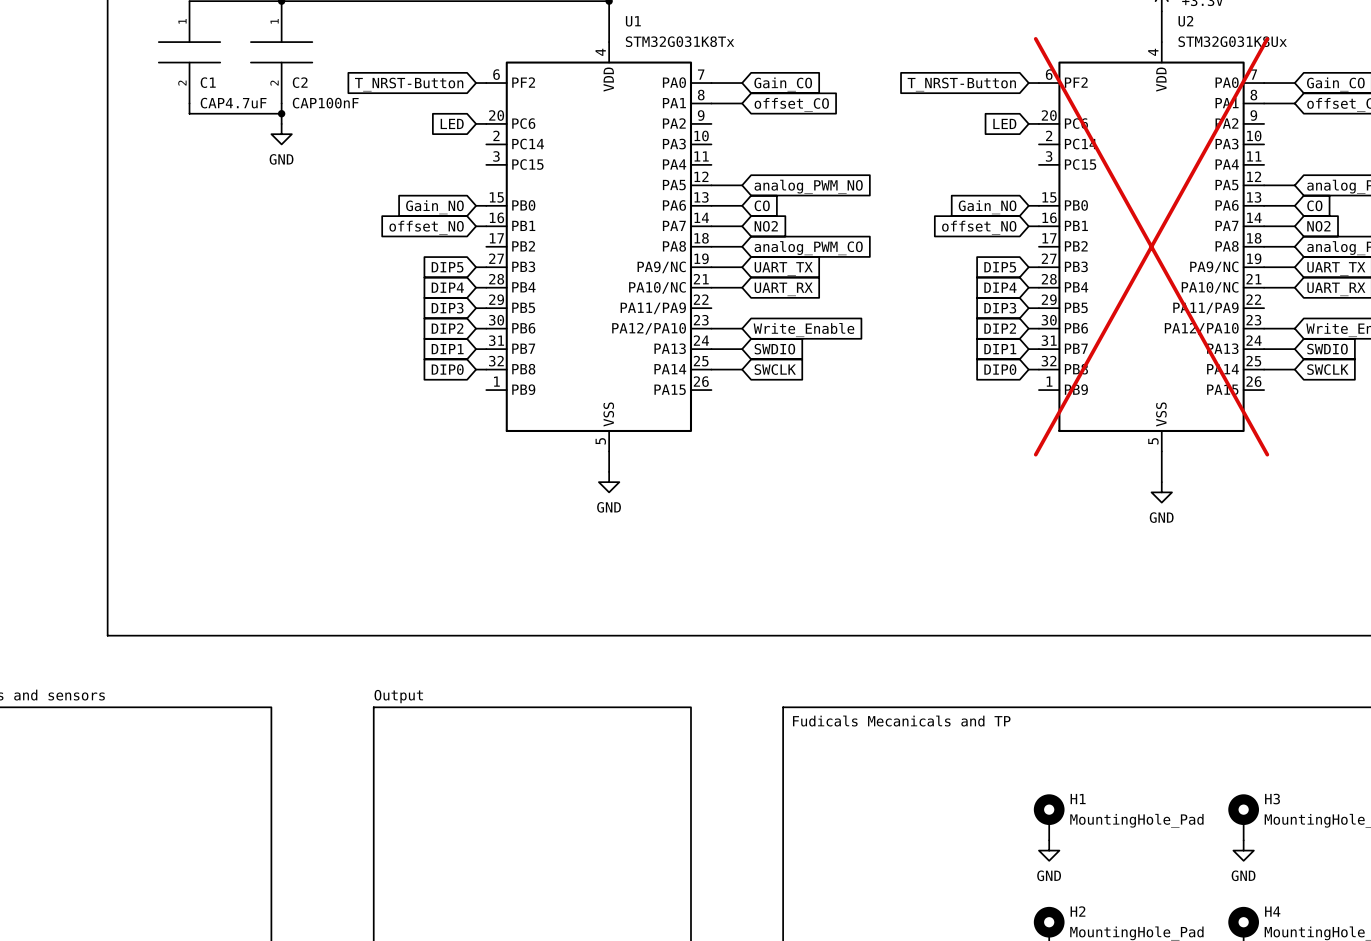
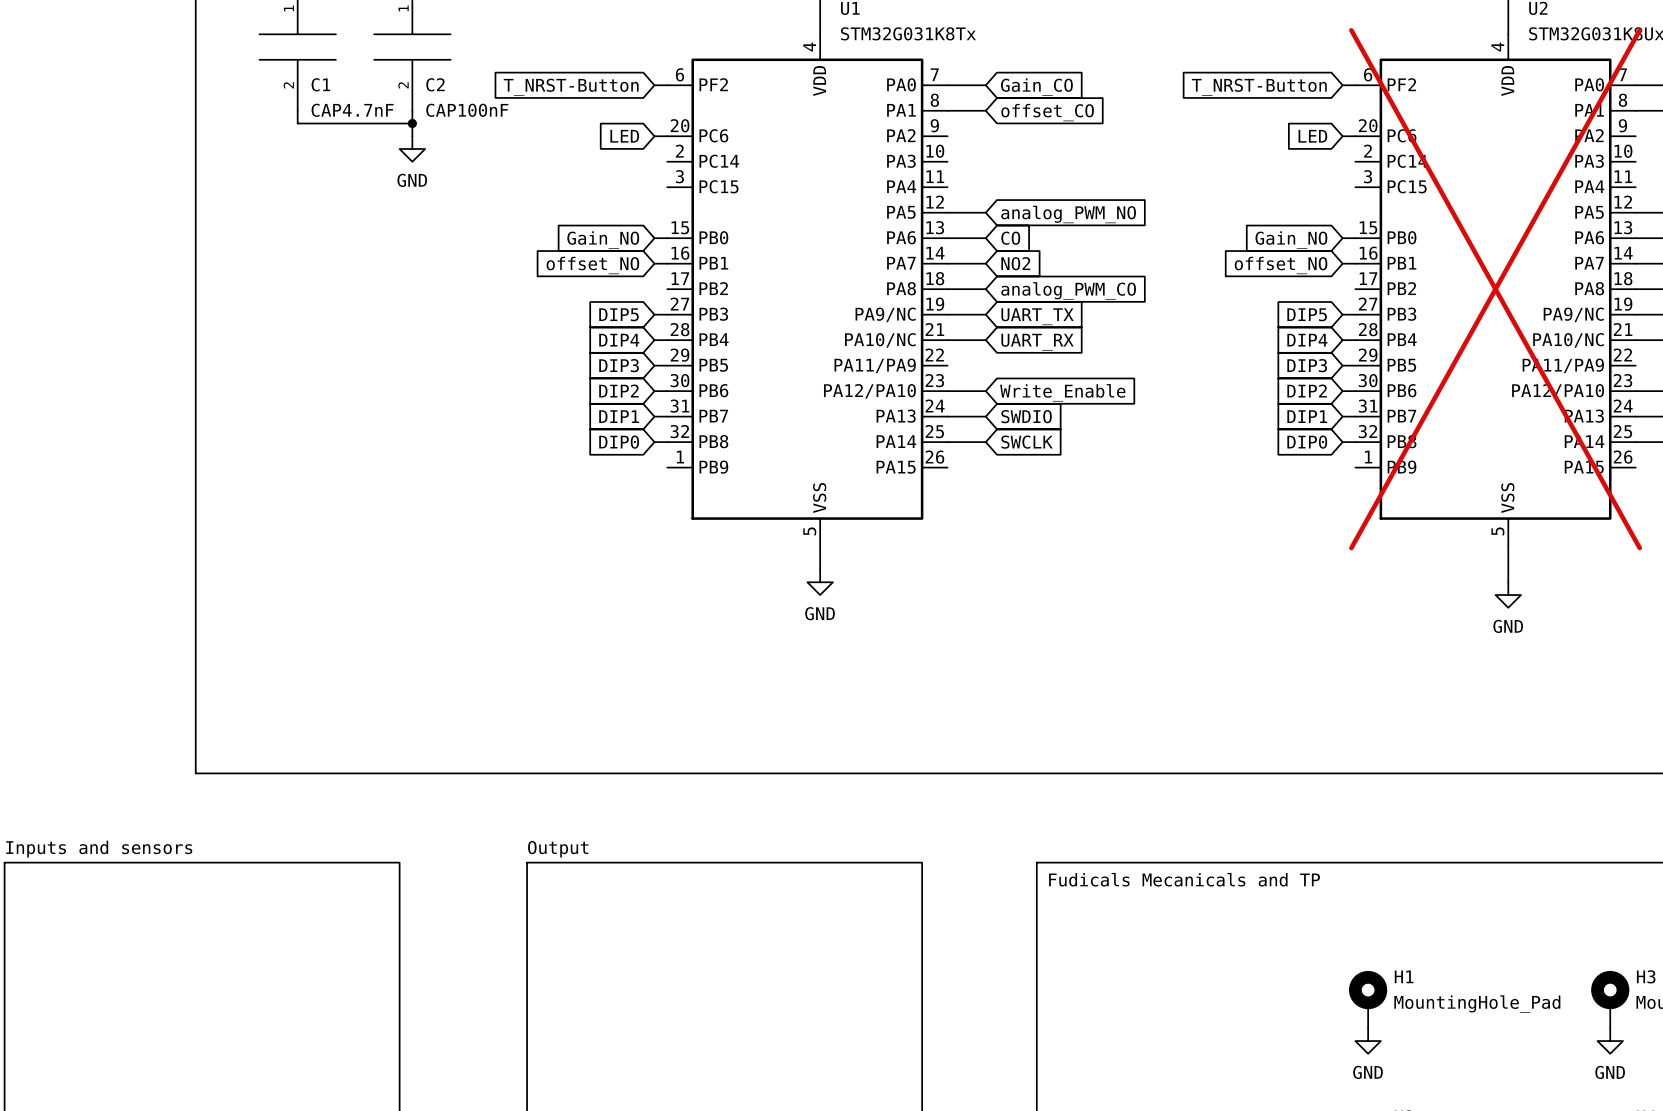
C1 value: CAP4.7uF (233, 103) -> CAP4.7nF (352, 110)

